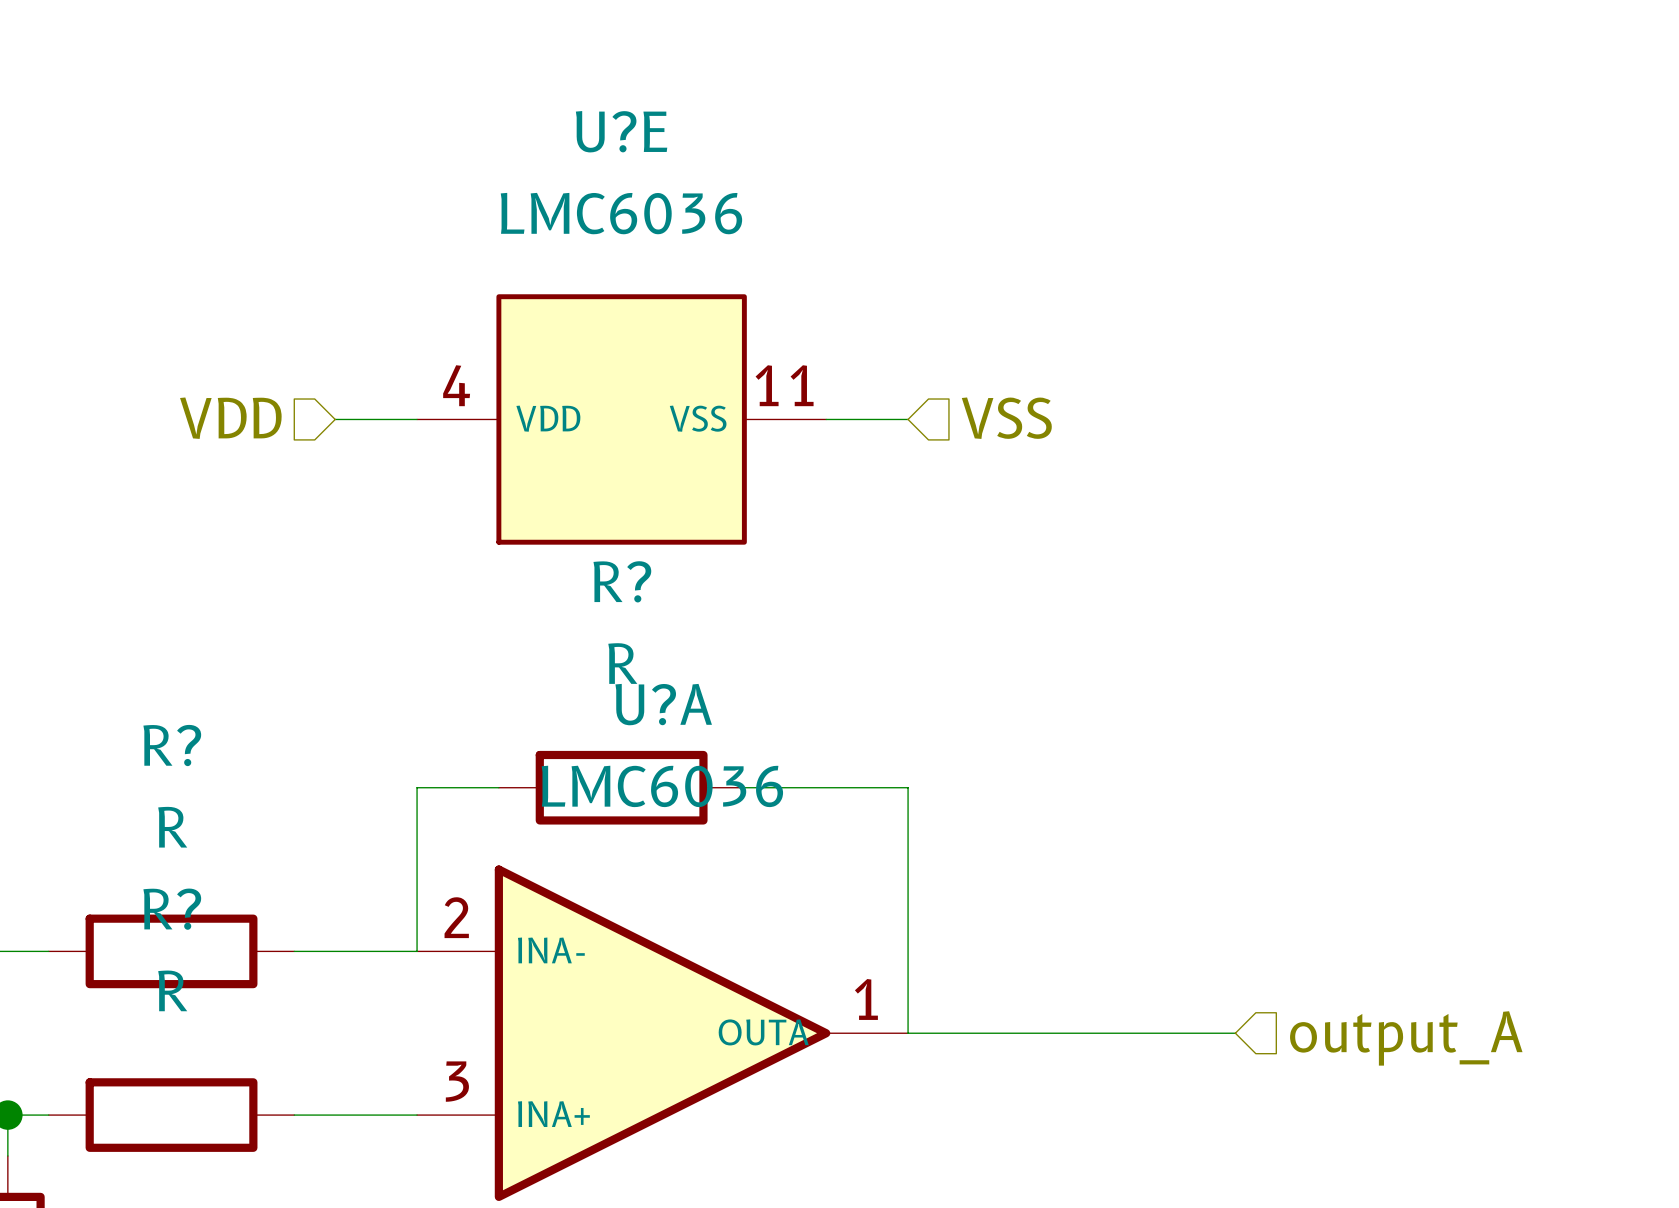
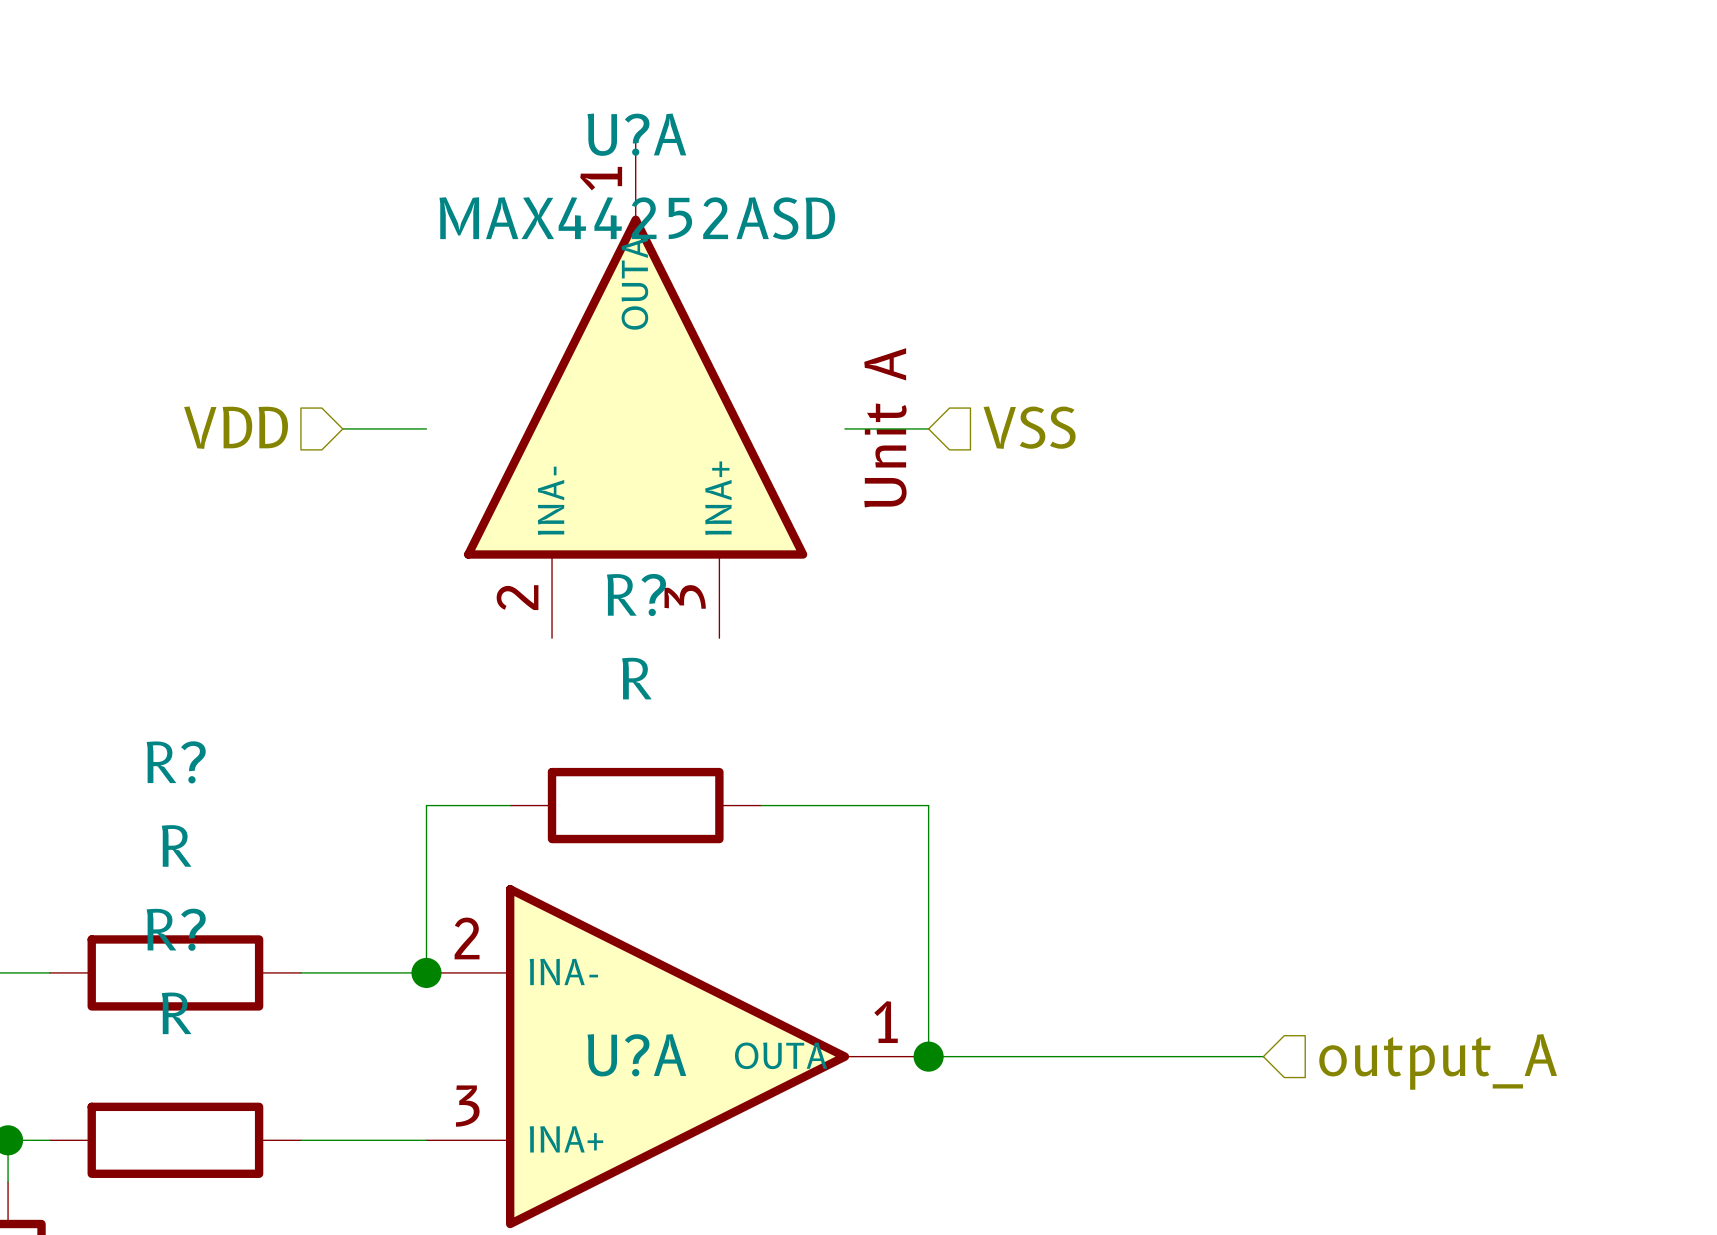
U?A: none -> MAX44252ASD (635, 387)
U?E: LMC6036 (621, 419) -> none
U?A name position: U?A (663, 704) -> U?A (636, 1055)
U?A value: LMC6036 (662, 786) -> none
junction: none -> (426, 972)
junction: none -> (928, 1056)

